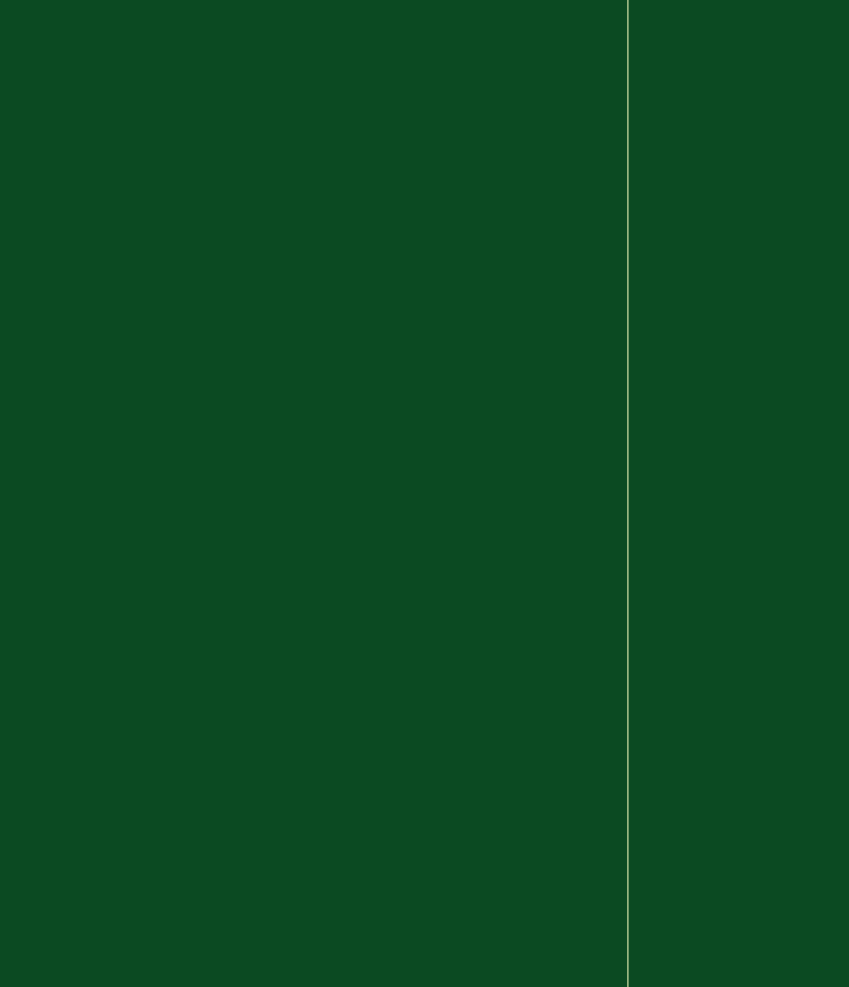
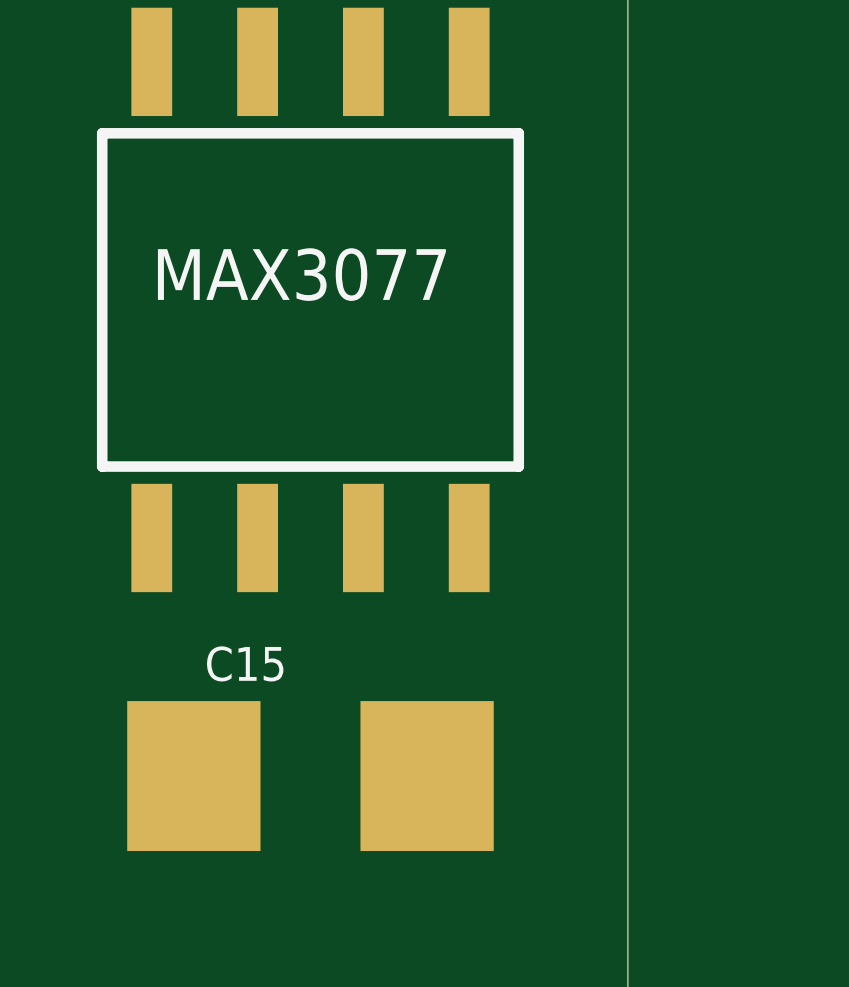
part: none -> (310, 299)
C15: none -> (310, 776)

